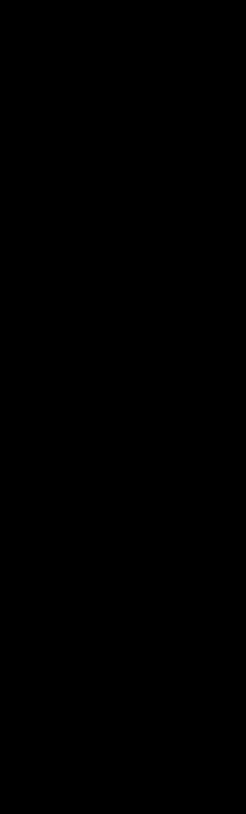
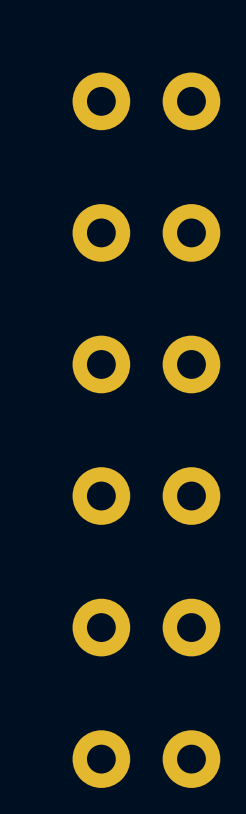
part: none -> (146, 101)
part: none -> (146, 232)
part: none -> (146, 364)
part: none -> (146, 496)
part: none -> (146, 627)
part: none -> (146, 759)

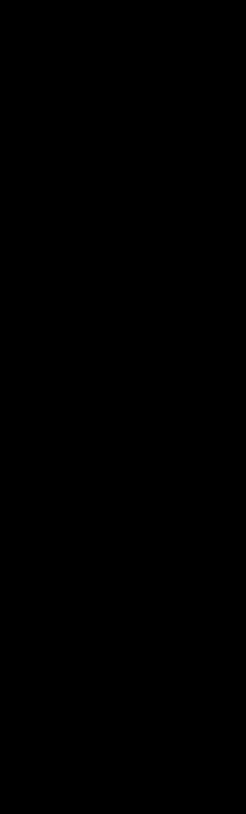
part: (146, 101) -> none
part: (146, 232) -> none
part: (146, 364) -> none
part: (146, 496) -> none
part: (146, 627) -> none
part: (146, 759) -> none

